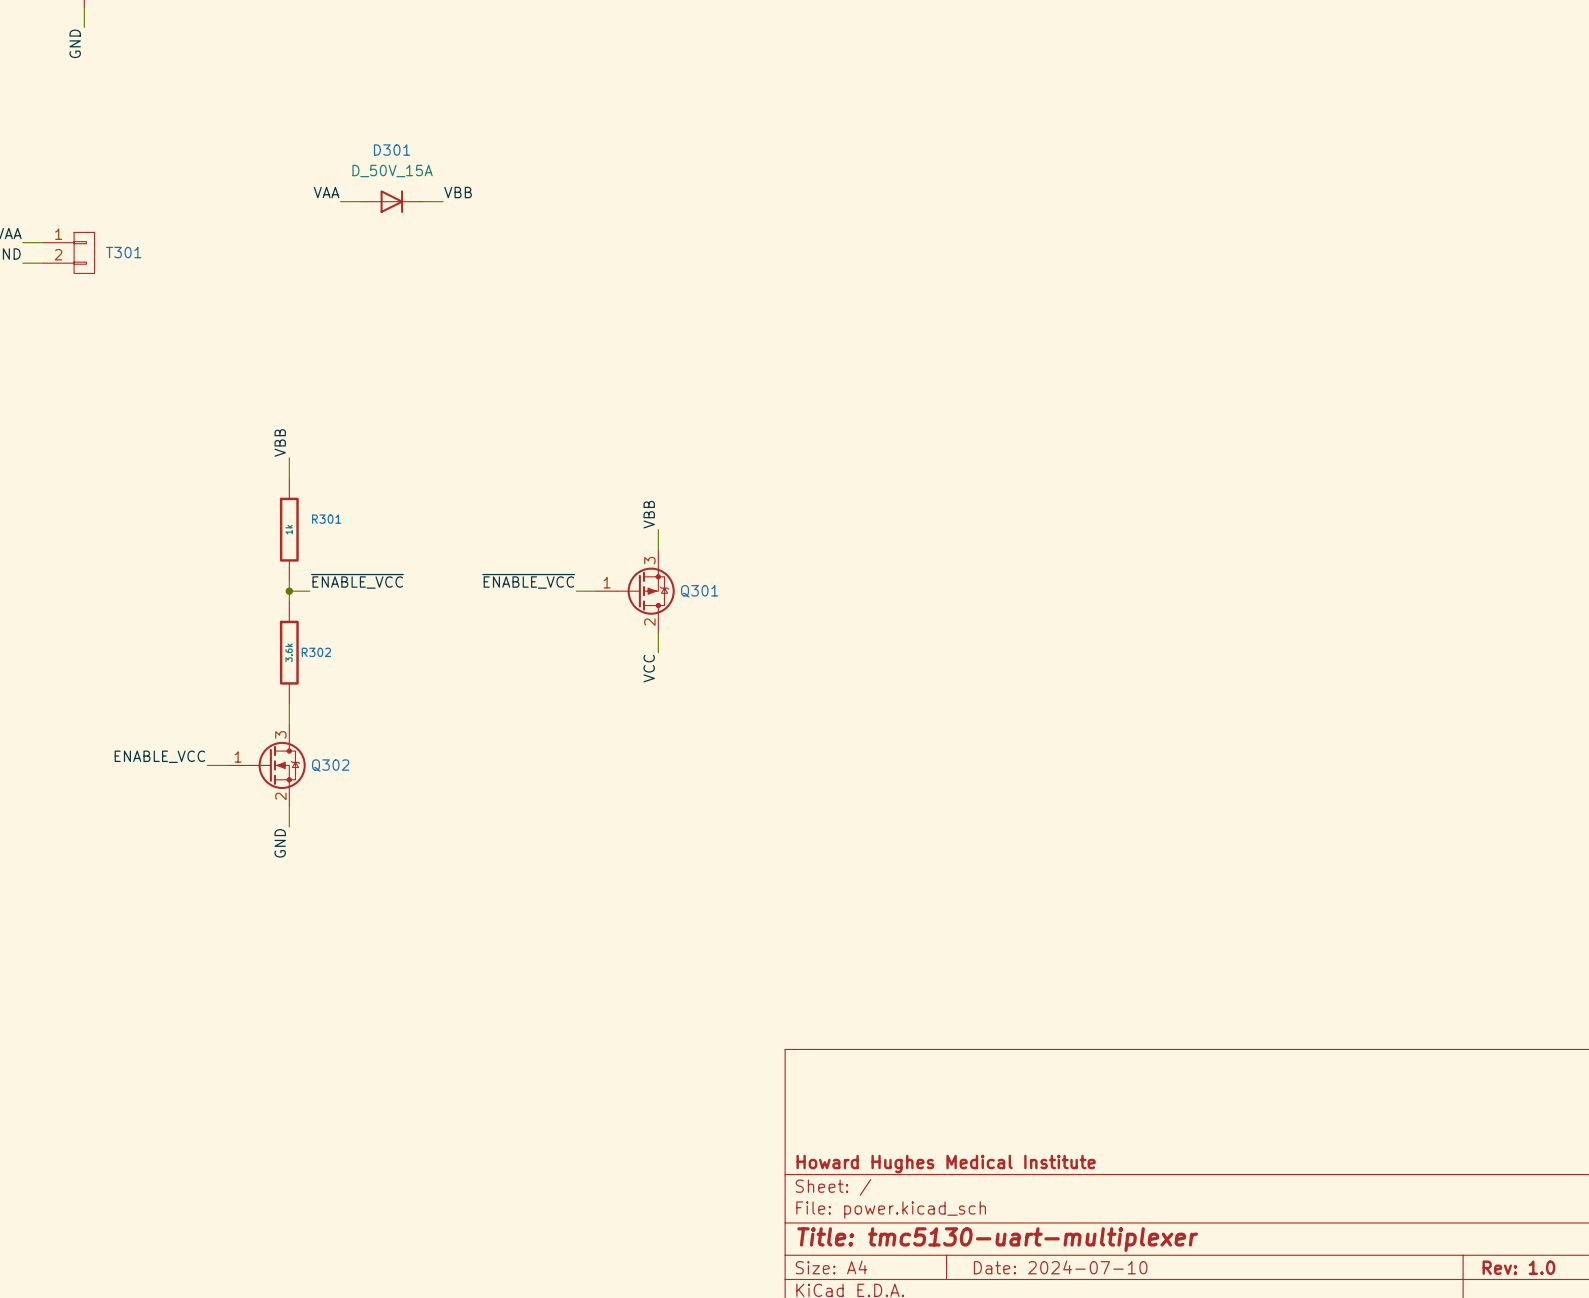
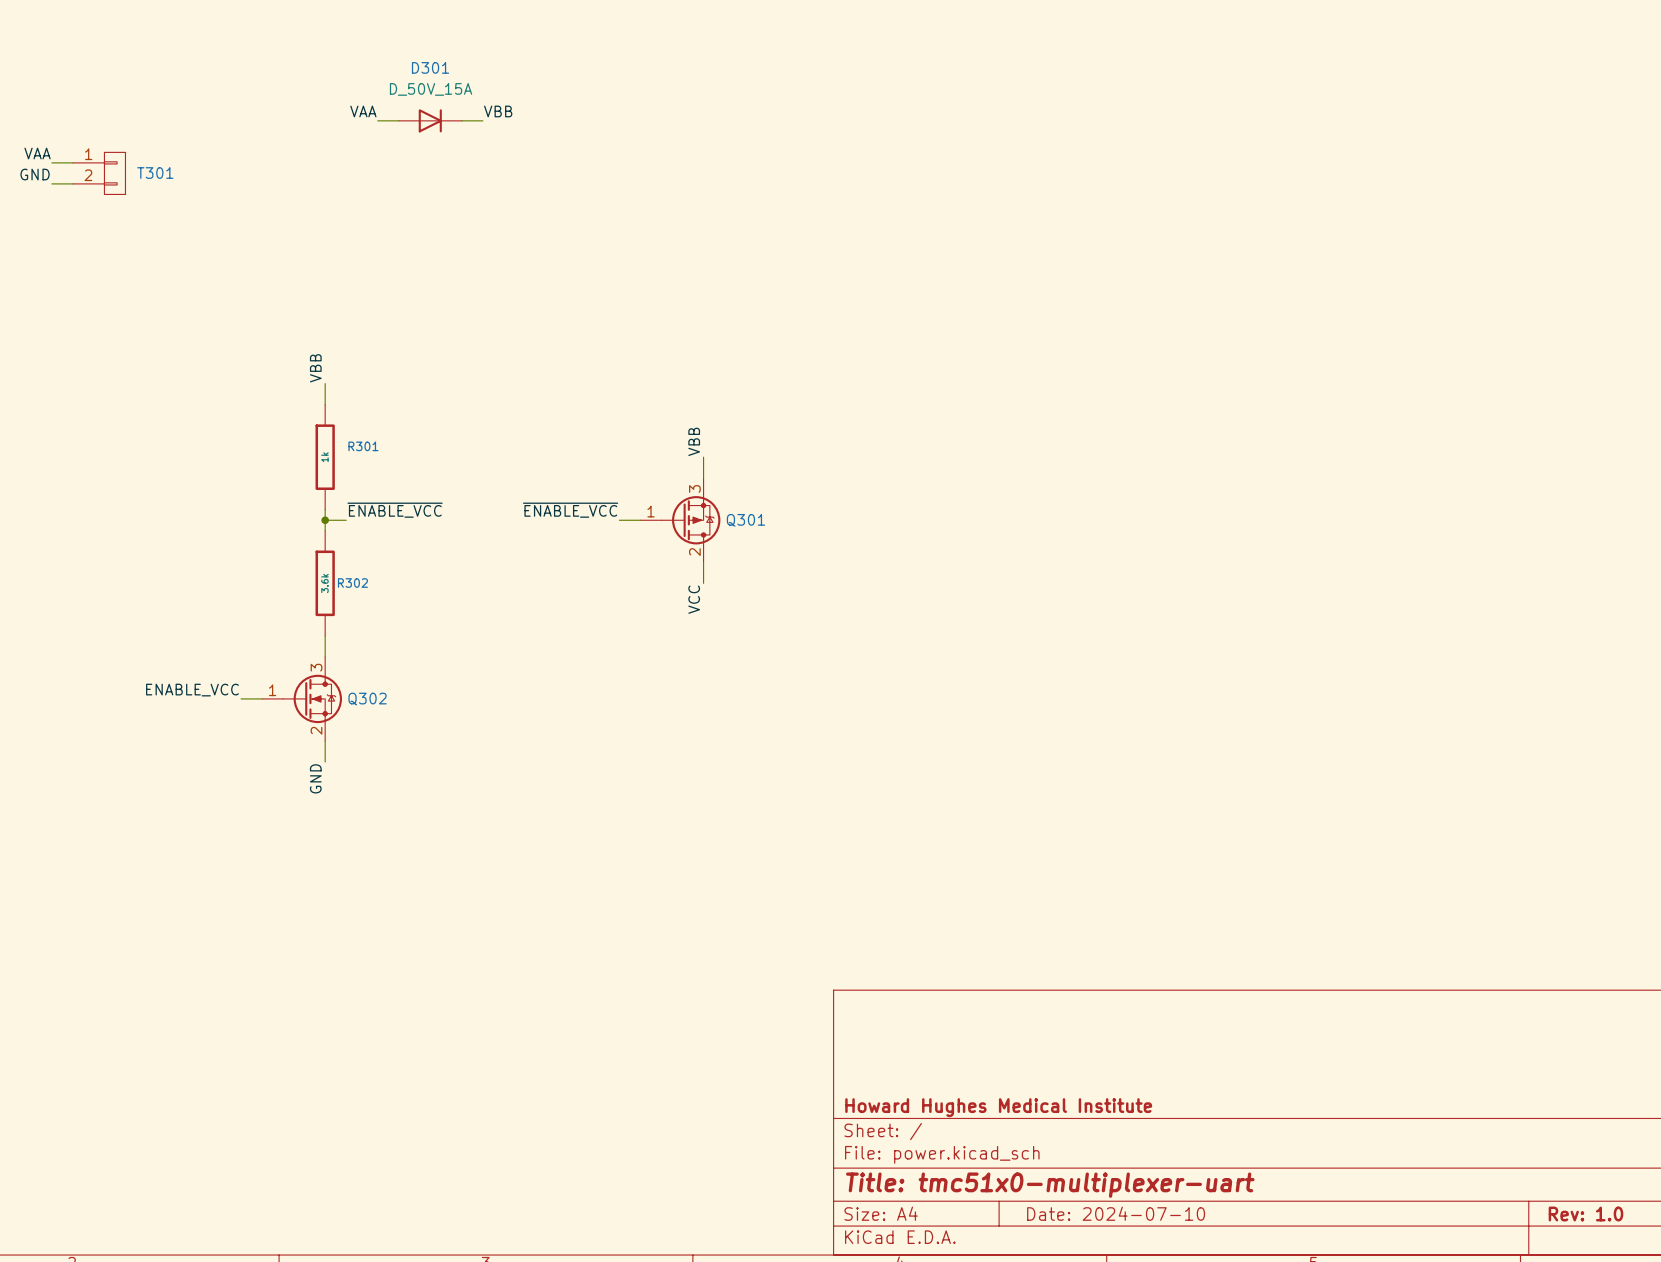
title block: Title: tmc5130-uart-multiplexer (997, 1239) -> Title: tmc51x0-multiplexer-uart (1050, 1185)

